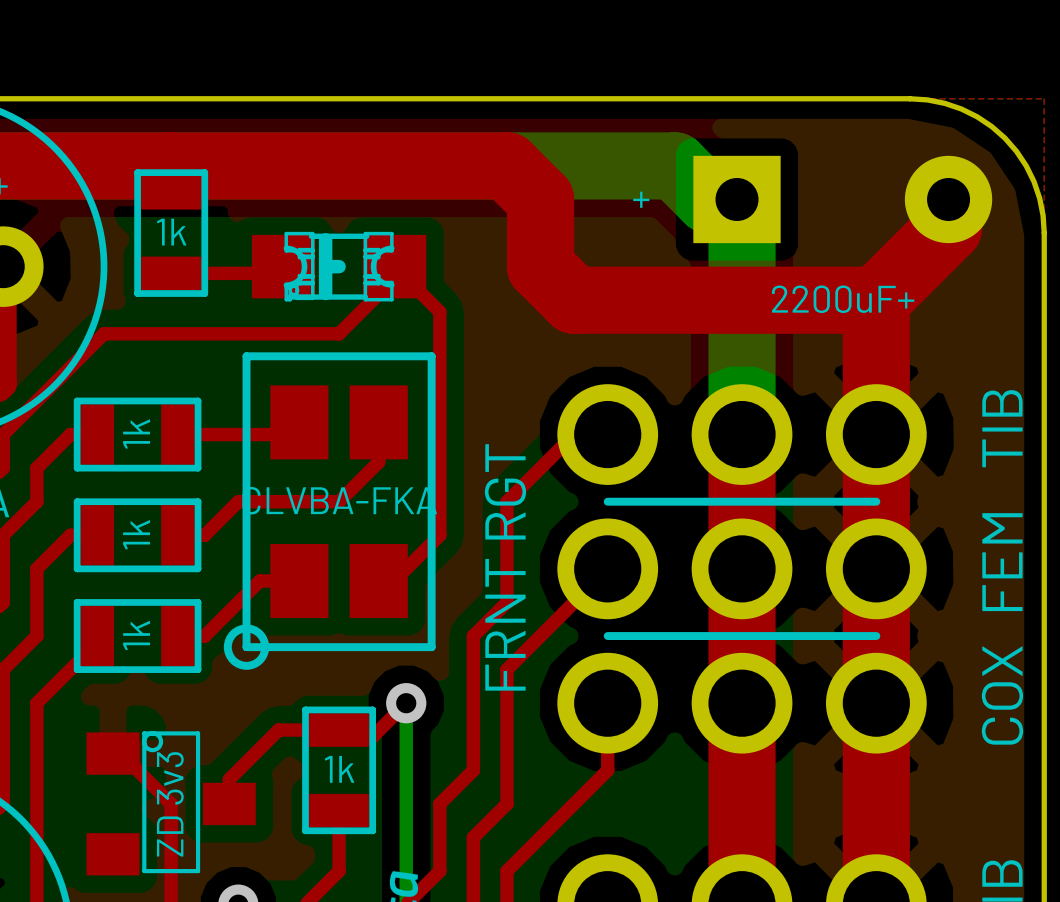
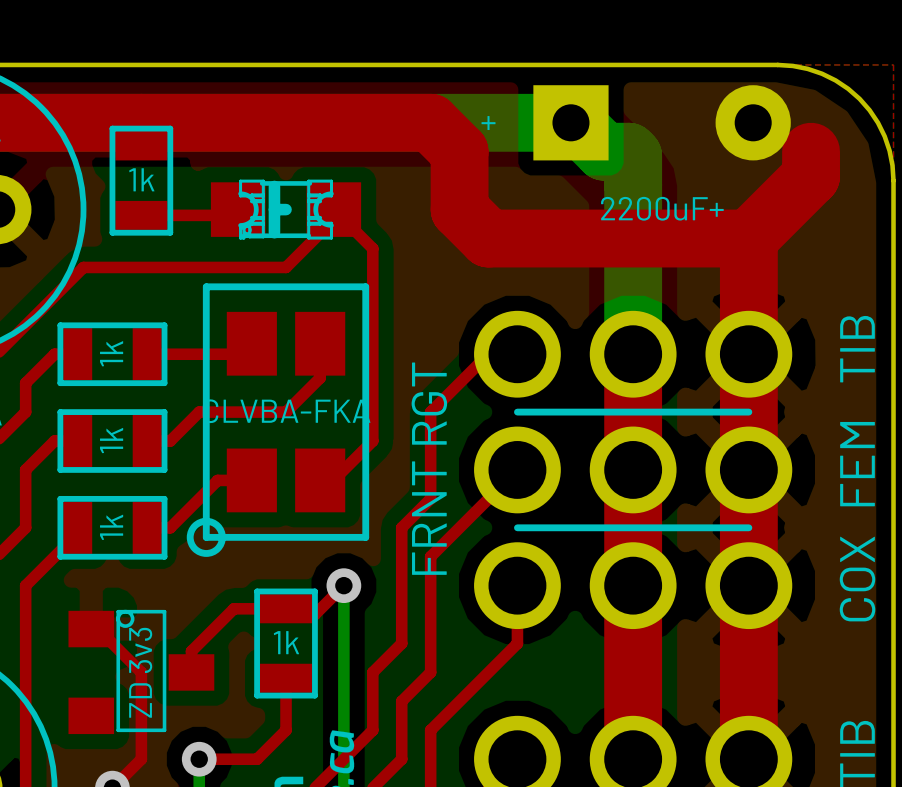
part position: (842, 199) -> (662, 122)

